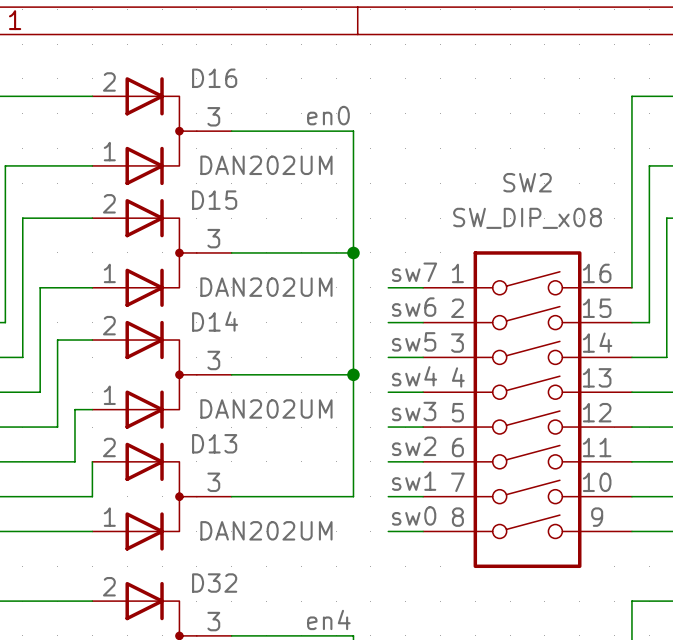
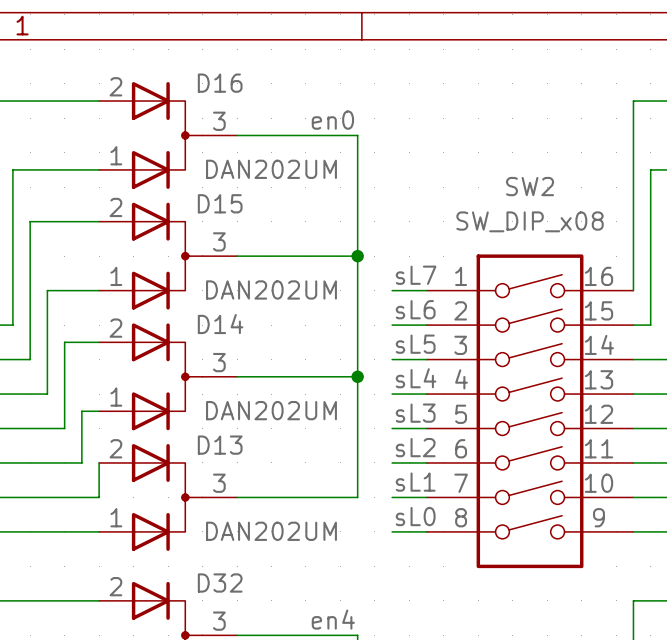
label: sw7 (414, 272) -> sL7 (416, 275)
label: sw6 (414, 307) -> sL6 (415, 309)
label: sw5 (414, 341) -> sL5 (415, 344)
label: sw4 (414, 376) -> sL4 (416, 378)
label: sw3 (414, 411) -> sL3 (415, 413)
label: sw2 (414, 446) -> sL2 (415, 447)
label: sw1 (414, 481) -> sL1 (415, 482)
label: sw0 (414, 515) -> sL0 (415, 516)

